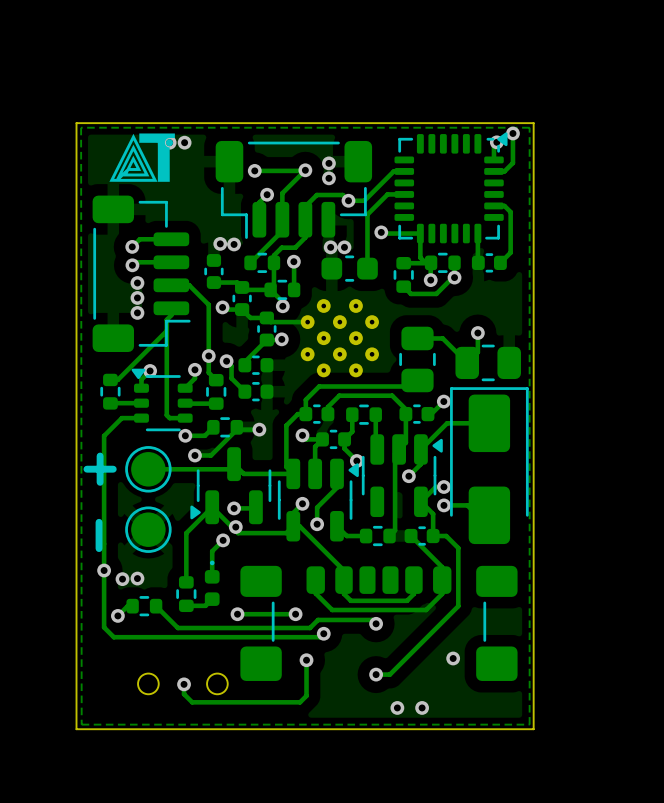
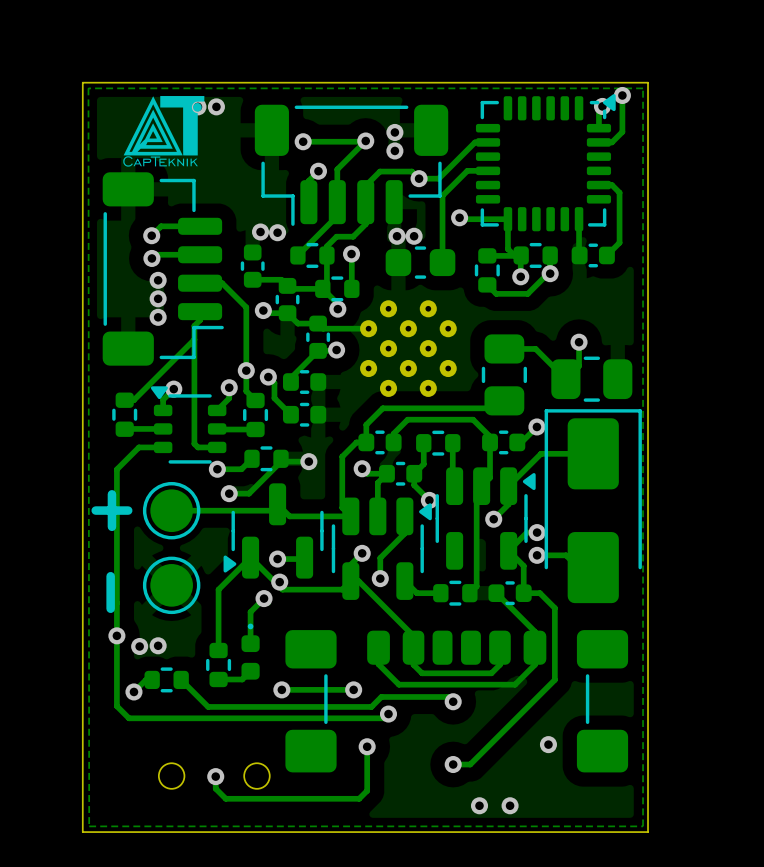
drawing shape: [109, 133, 175, 182] -> [123, 96, 205, 167]

